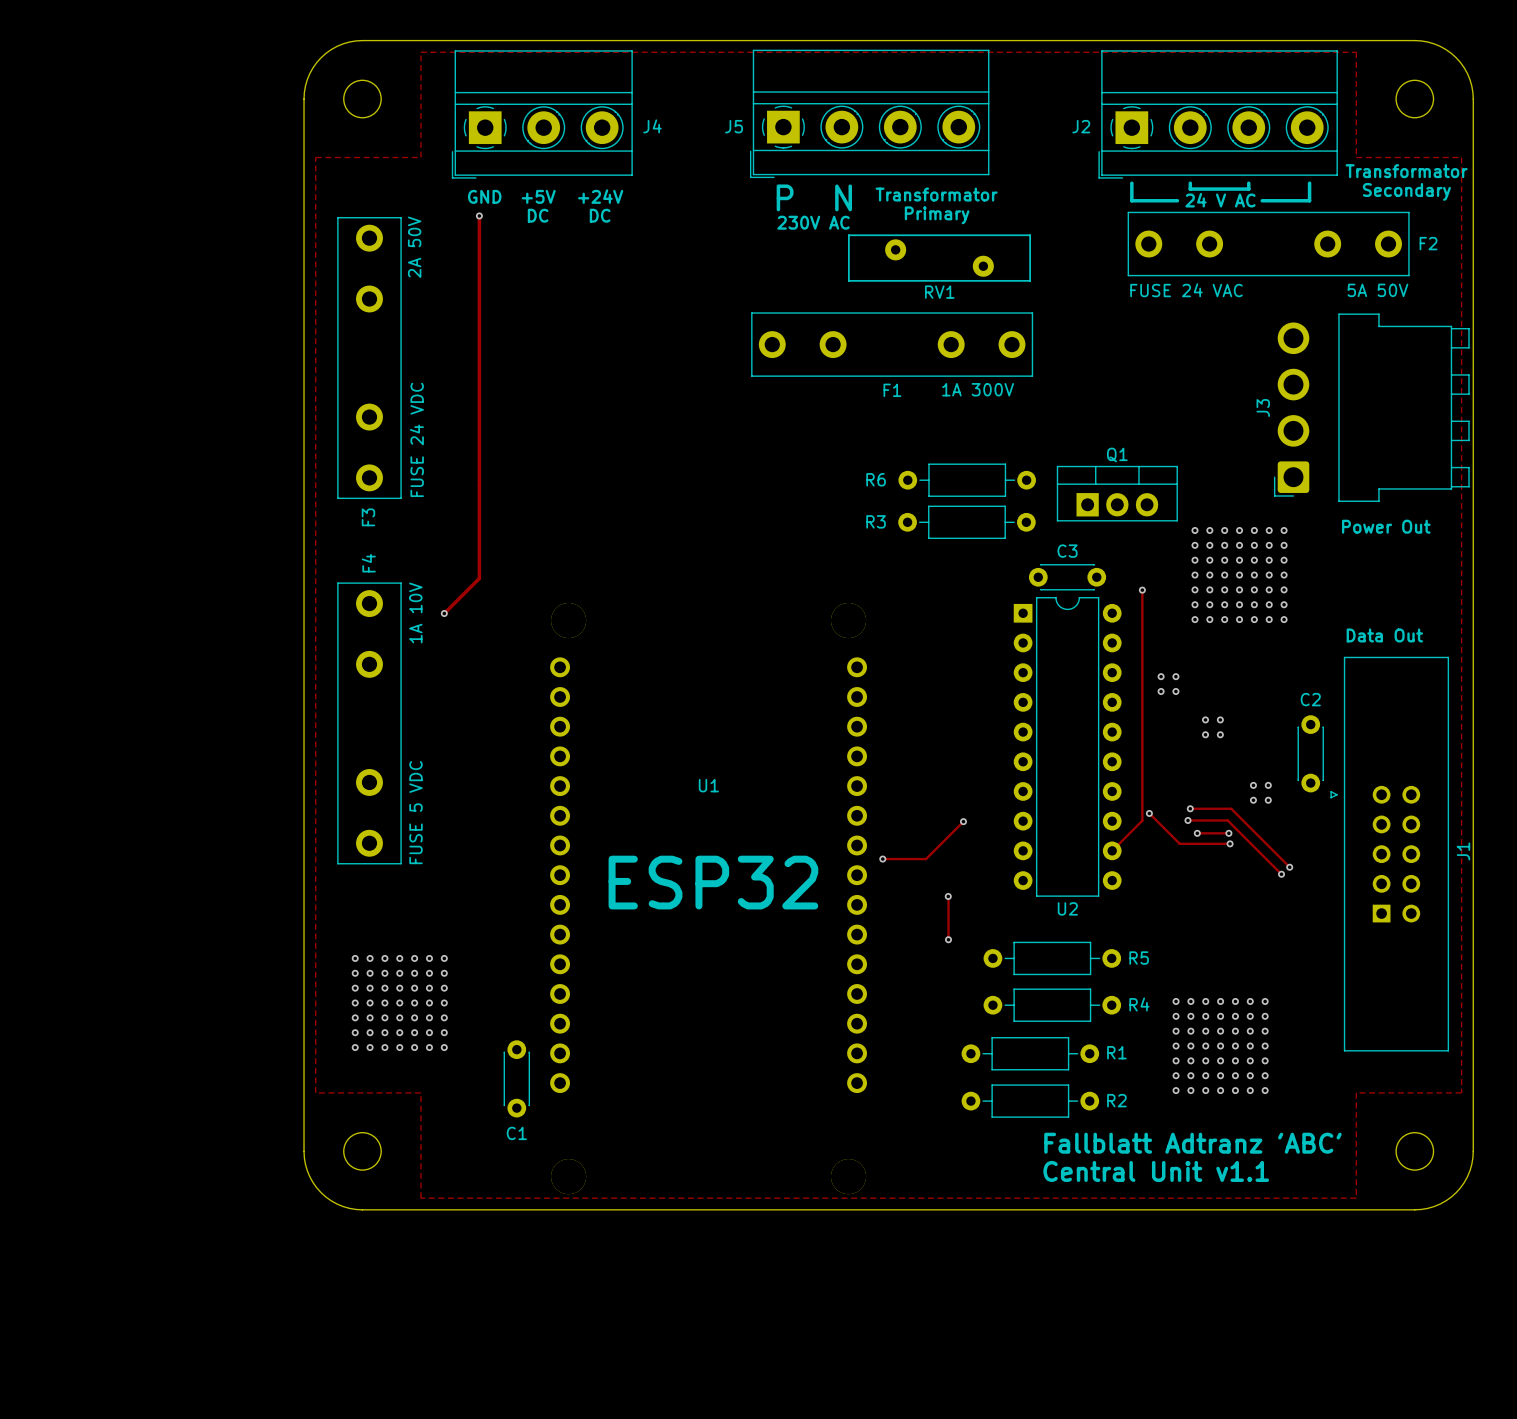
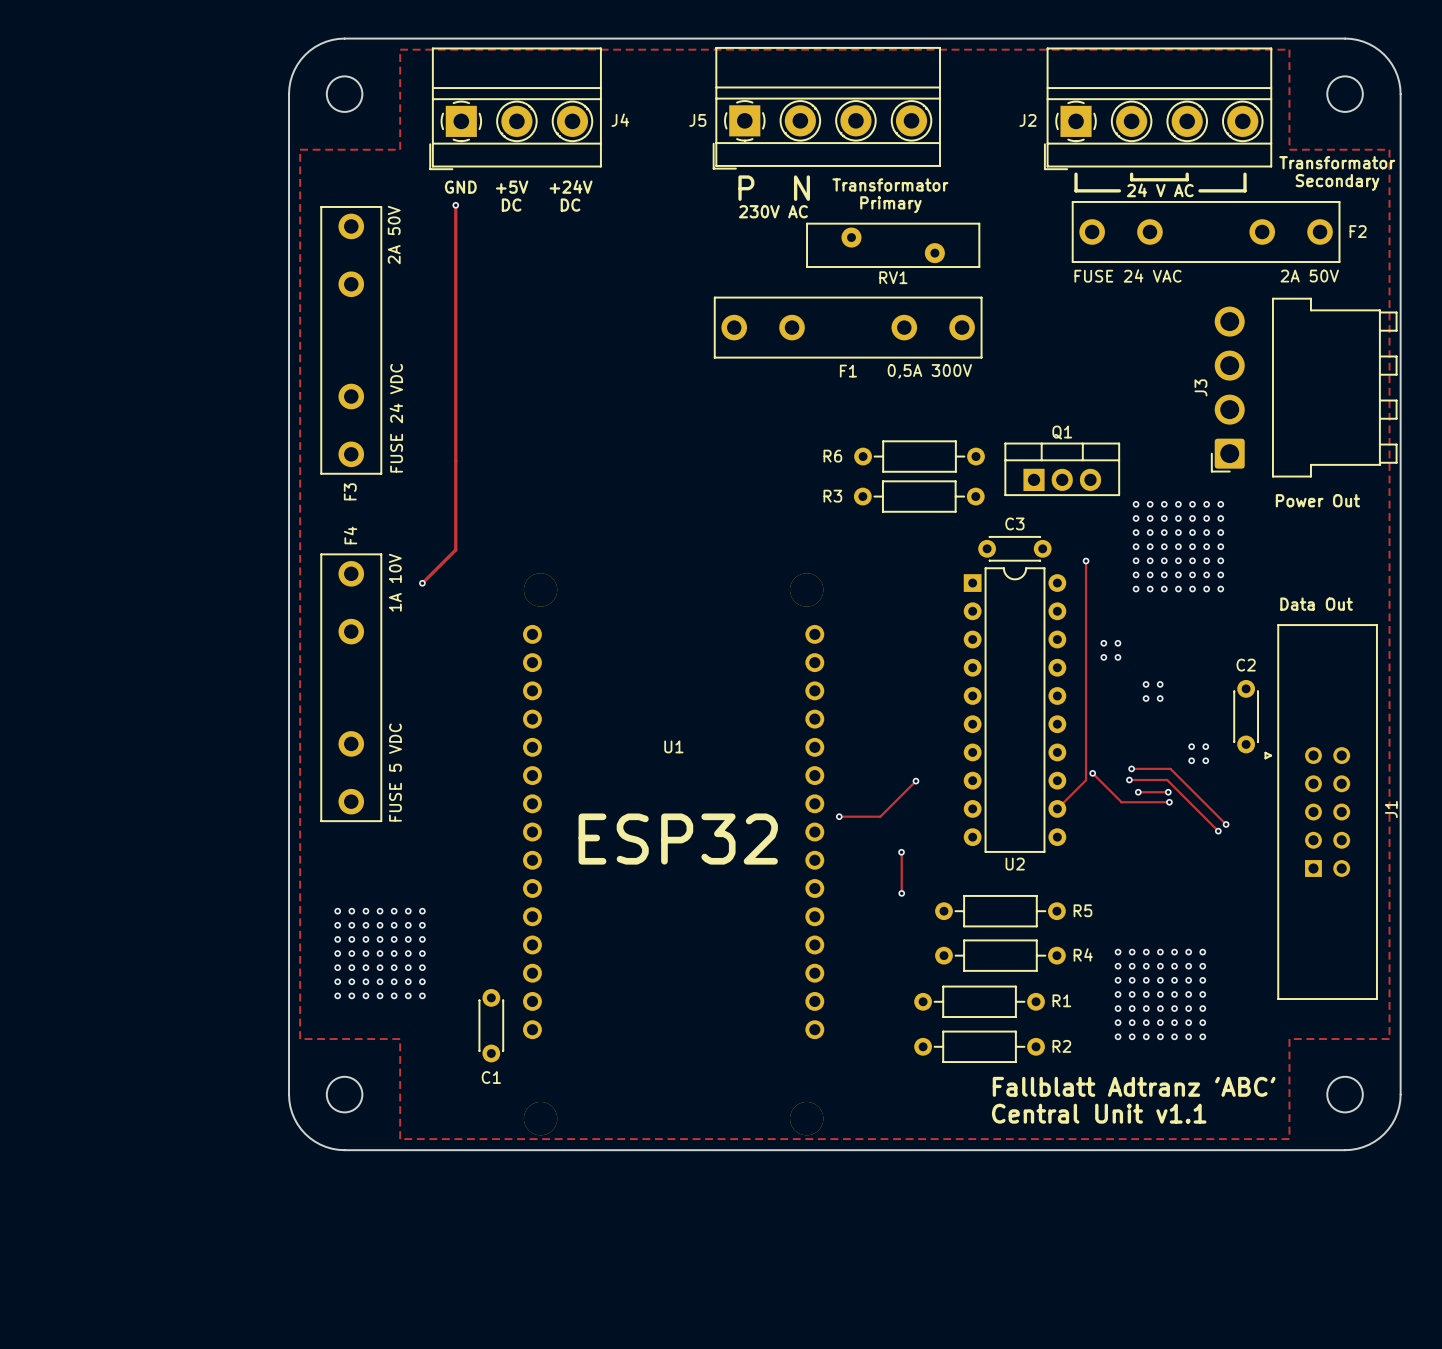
F2 value: 5A 50V (1377, 290) -> 2A 50V (1309, 276)
F1 value: 1A 300V (978, 389) -> 0,5A 300V (929, 371)

